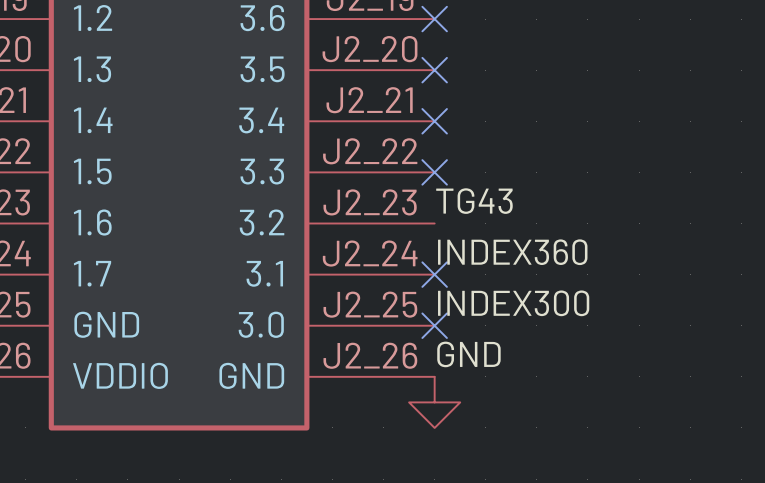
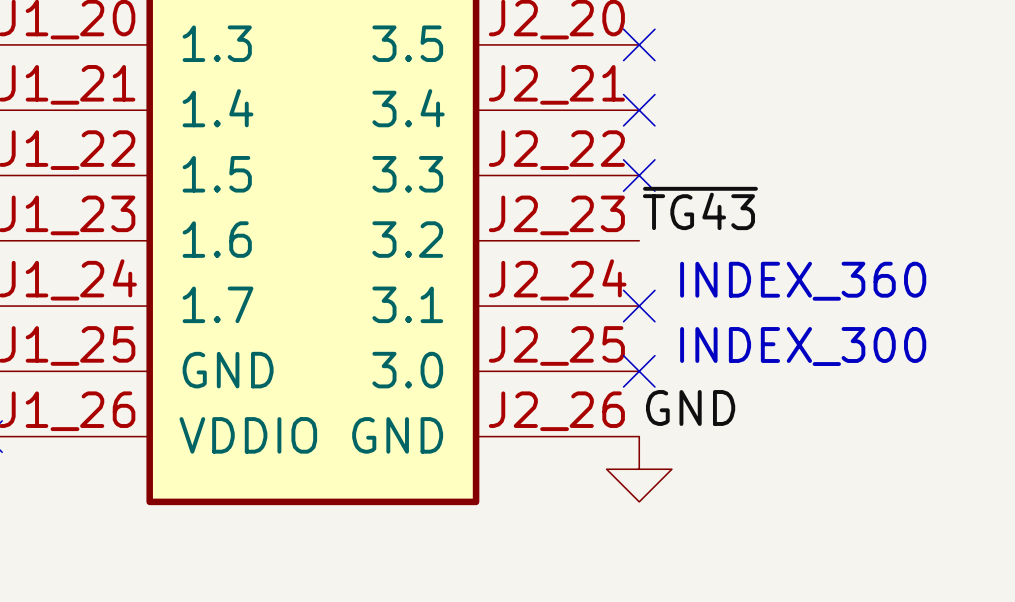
label: TG43 (474, 201) -> ~{TG43} (700, 208)
label: INDEX360 (512, 252) -> none
text: none -> INDEX_360 (803, 281)
label: INDEX300 (513, 303) -> none
text: none -> INDEX_300 (803, 346)

